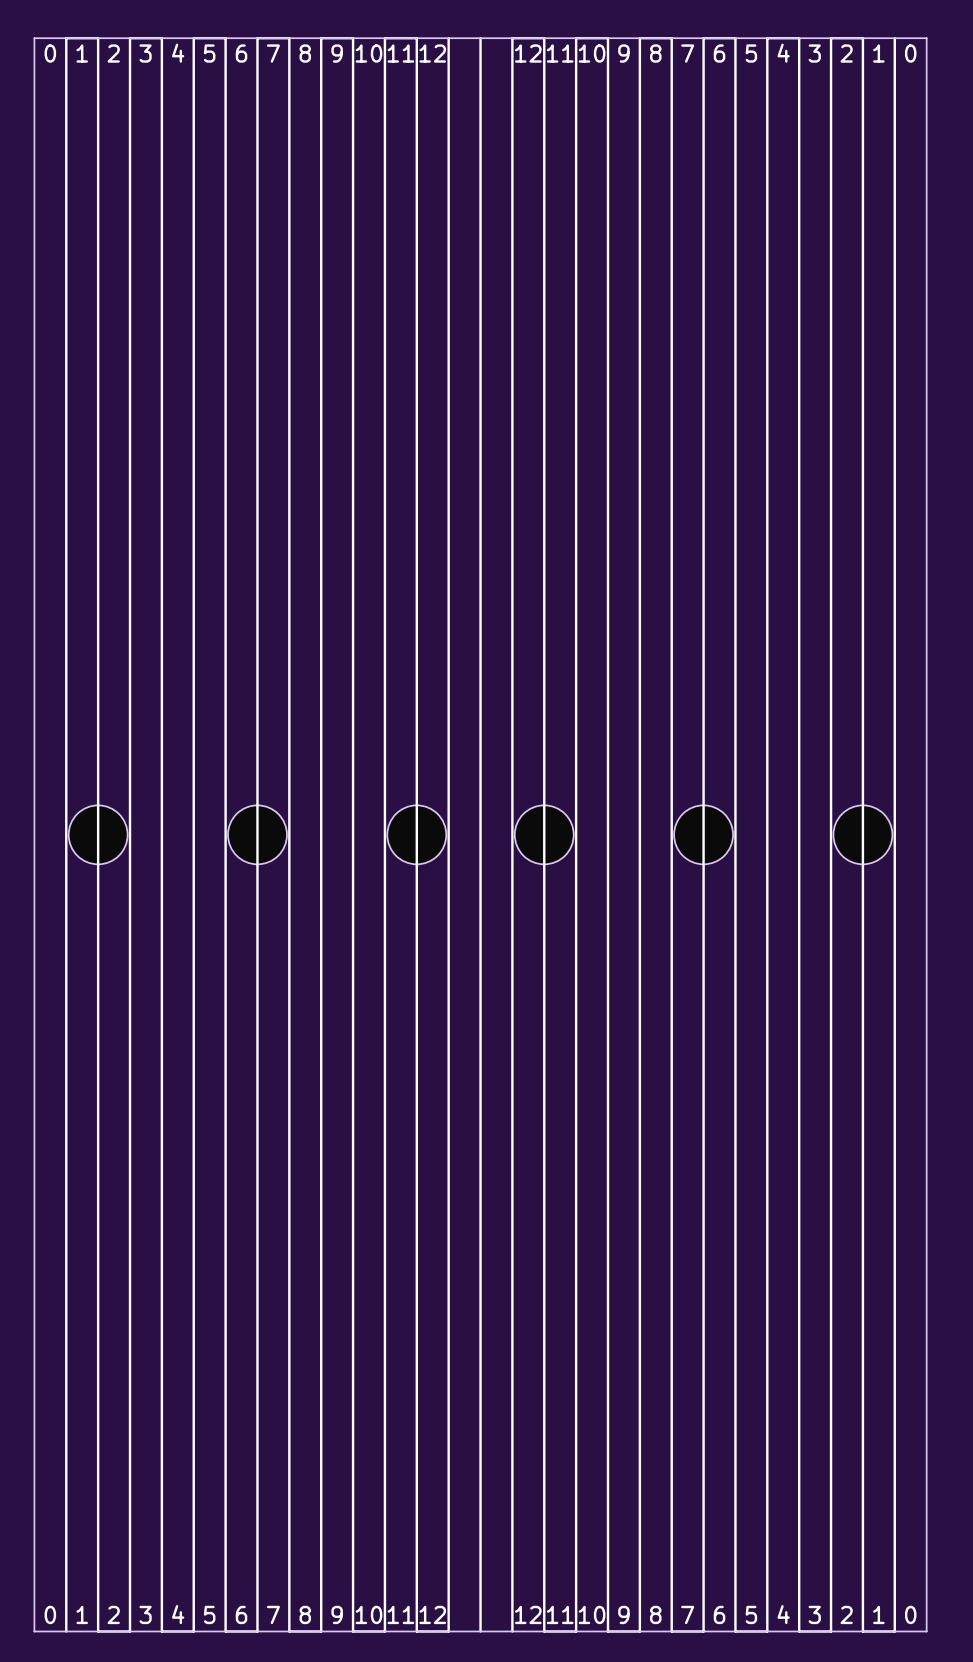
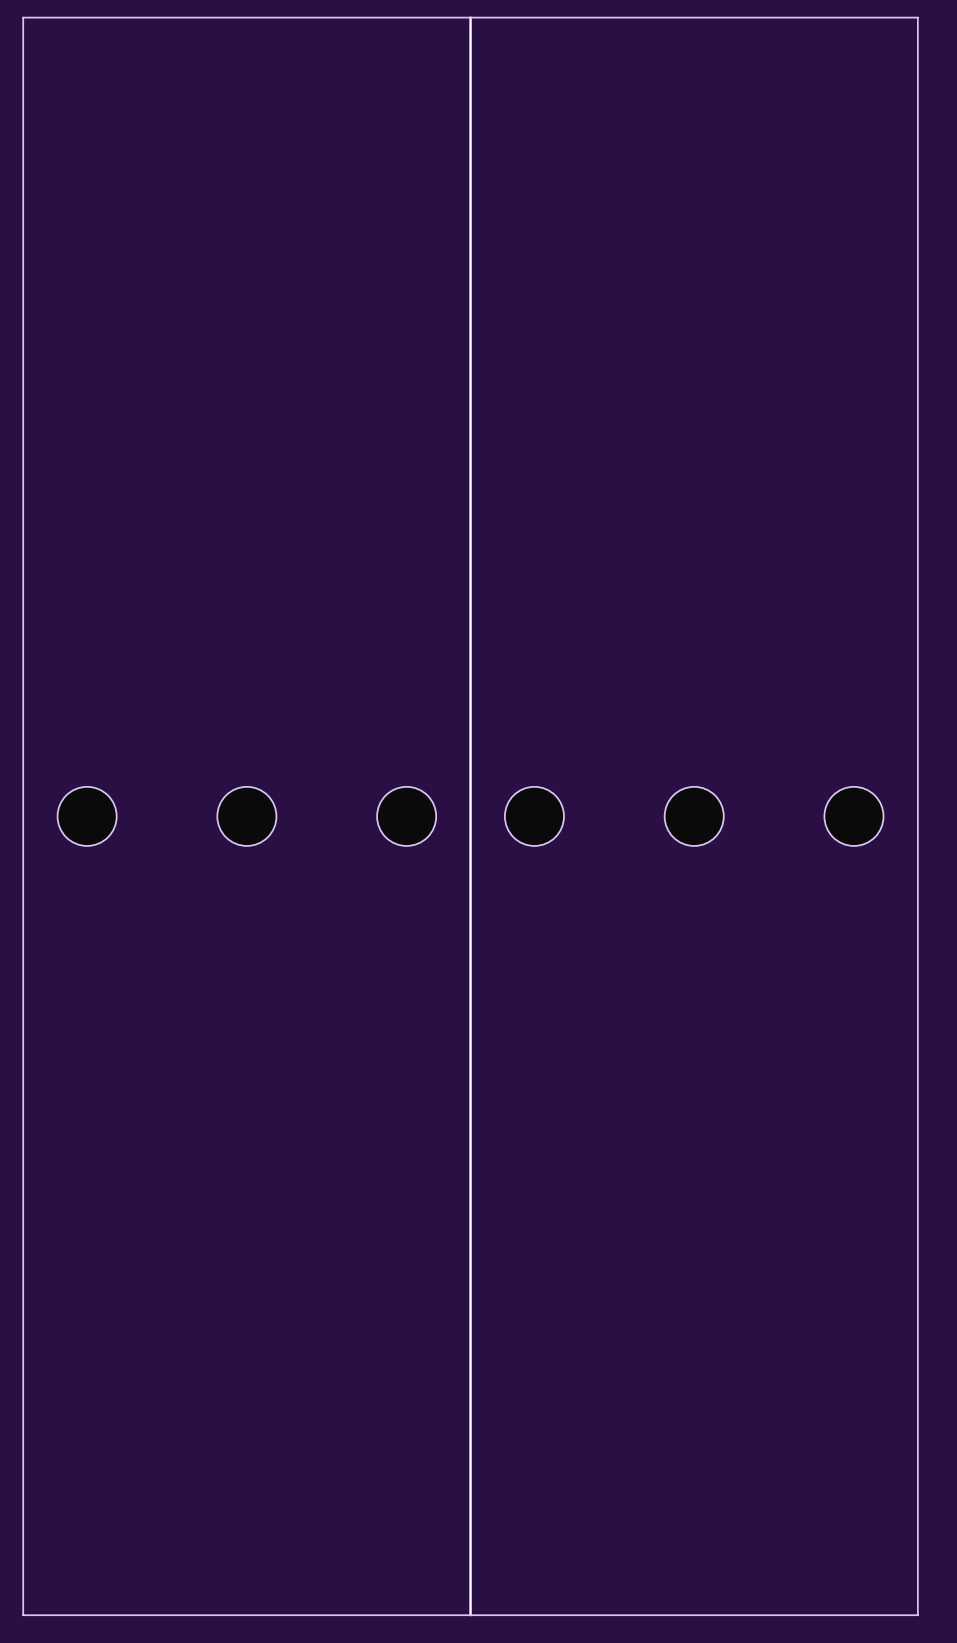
line: (448, 38) (448, 1631) (416, 1631) (416, 38) (384, 38) (384, 1631) (353, 1631) (353, 38) (321, 38) (321, 1631) (289, 1631) (289, 38) (257, 38) (257, 1631) (225, 1631) (225, 38) (193, 38) (193, 1631) (161, 1631) (161, 38) (130, 38) (130, 1631) (98, 1631) (98, 38) (66, 38) (66, 1631) -> none
line: (894, 38) (894, 1631) (862, 1631) (862, 38) (831, 38) (831, 1631) (799, 1631) (799, 38) (767, 38) (767, 1631) (735, 1631) (735, 38) (703, 38) (703, 1631) (671, 1631) (671, 38) (639, 38) (639, 1631) (607, 1631) (607, 38) (576, 38) (576, 1631) (544, 1631) (544, 38) (512, 38) (512, 1631) -> none
text: 0 (50, 53) -> none
text: 1 (82, 53) -> none
text: 2 (113, 53) -> none
text: 3 (145, 53) -> none
text: 4 (178, 53) -> none
text: 5 (209, 53) -> none
text: 6 (241, 53) -> none
text: 7 (273, 53) -> none
text: 8 (305, 53) -> none
text: 9 (337, 53) -> none
text: 10 (369, 53) -> none
text: 11 (400, 53) -> none
text: 12 (432, 53) -> none
text: 12 (528, 53) -> none
text: 11 (560, 53) -> none
text: 10 (592, 53) -> none
text: 9 (623, 53) -> none
text: 8 (655, 53) -> none
text: 7 (687, 53) -> none
text: 6 (719, 53) -> none
text: 5 (751, 53) -> none
text: 4 (783, 53) -> none
text: 3 (814, 53) -> none
text: 2 (846, 53) -> none
text: 1 (878, 53) -> none
text: 0 (910, 53) -> none
text: 0 (50, 1614) -> none
text: 1 (82, 1614) -> none
text: 2 (113, 1614) -> none
text: 3 (145, 1614) -> none
text: 4 (178, 1614) -> none
text: 5 (209, 1614) -> none
text: 6 (241, 1614) -> none
text: 7 (273, 1614) -> none
text: 8 (305, 1614) -> none
text: 9 (337, 1614) -> none
text: 10 (369, 1614) -> none
text: 11 (400, 1614) -> none
text: 12 (432, 1614) -> none
text: 12 (528, 1614) -> none
text: 11 (560, 1614) -> none
text: 10 (592, 1614) -> none
text: 9 (623, 1614) -> none
text: 8 (655, 1614) -> none
text: 7 (687, 1614) -> none
text: 6 (719, 1614) -> none
text: 5 (751, 1614) -> none
text: 4 (783, 1614) -> none
text: 3 (814, 1614) -> none
text: 2 (846, 1614) -> none
text: 1 (878, 1614) -> none
text: 0 (910, 1614) -> none

